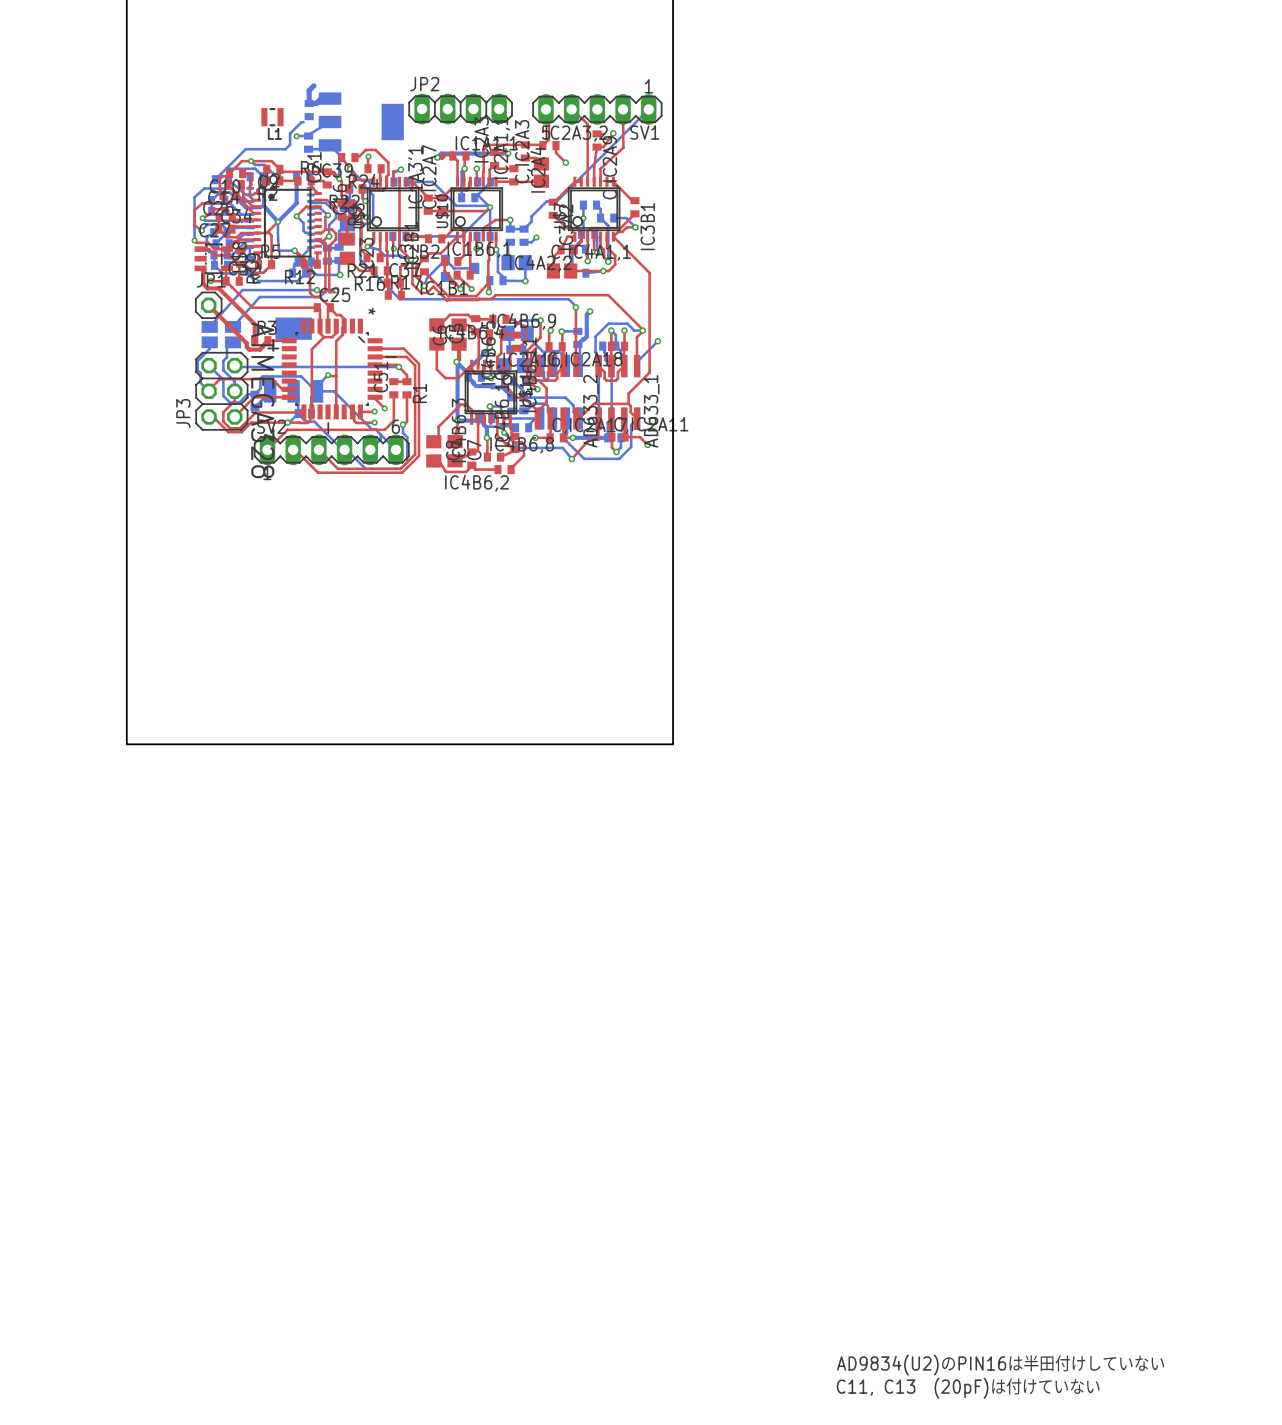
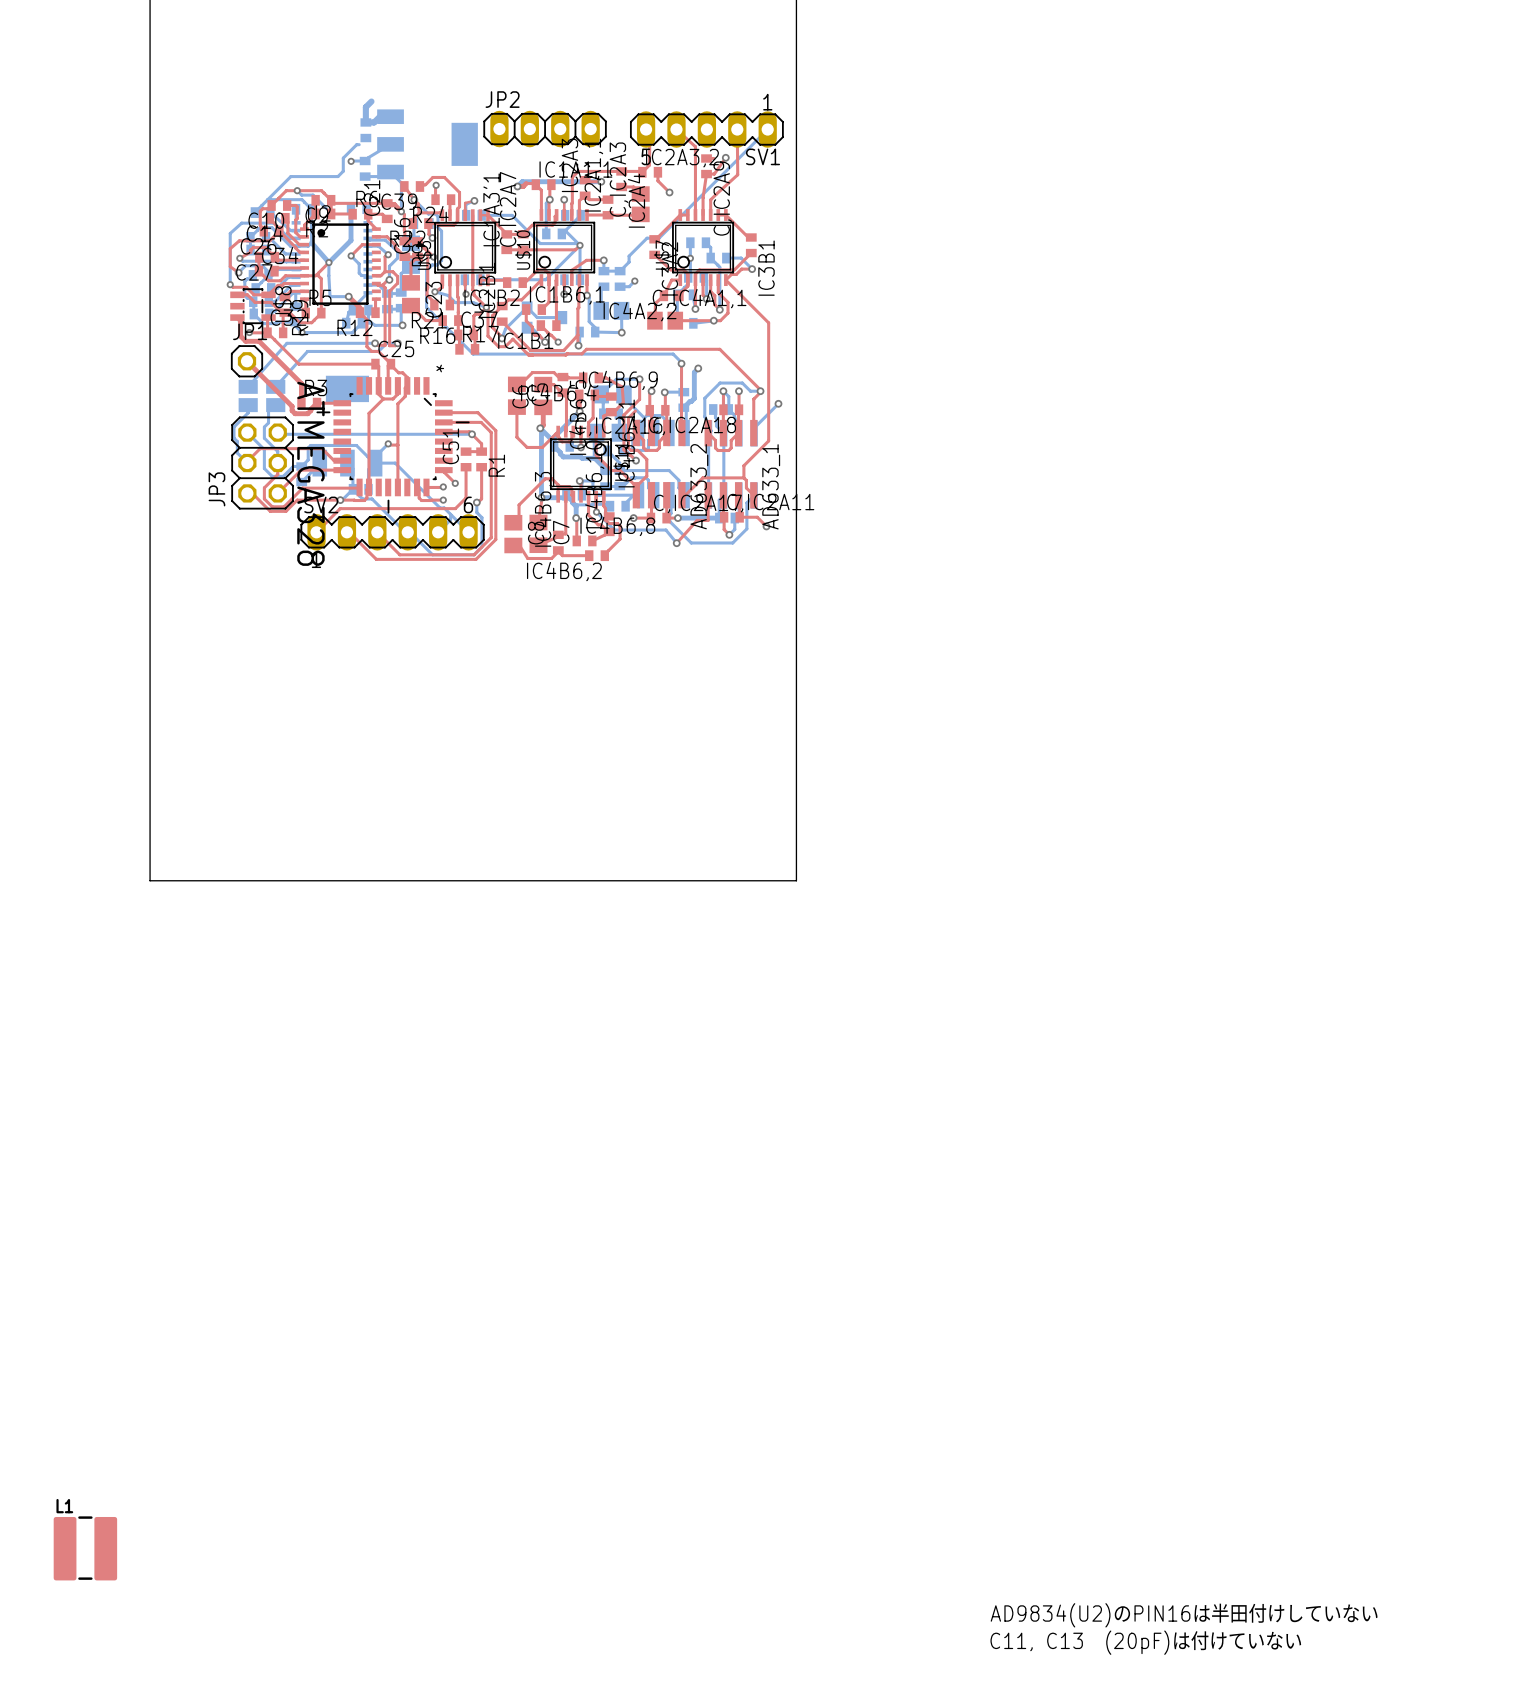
L1 footprint: [261, 108, 284, 127] -> [53, 1516, 118, 1581]
L1 name position: L1 (274, 133) -> L1 (64, 1506)

